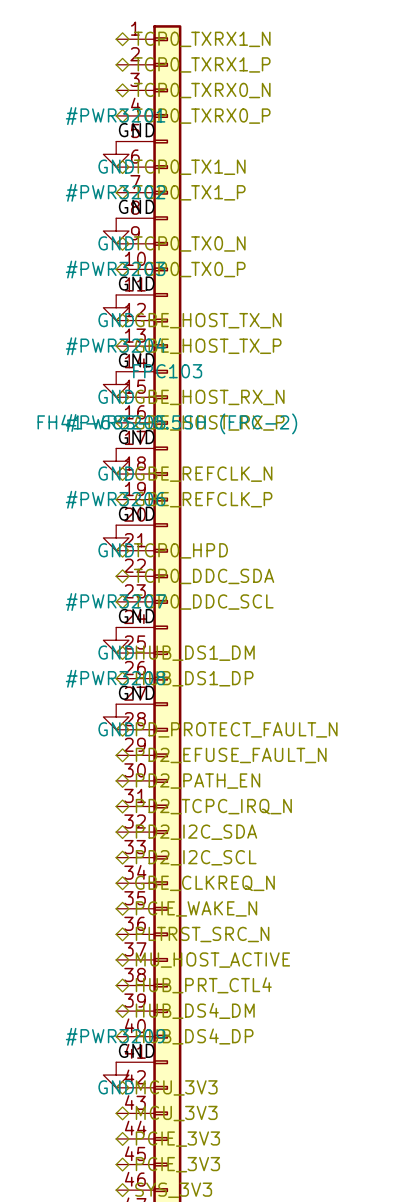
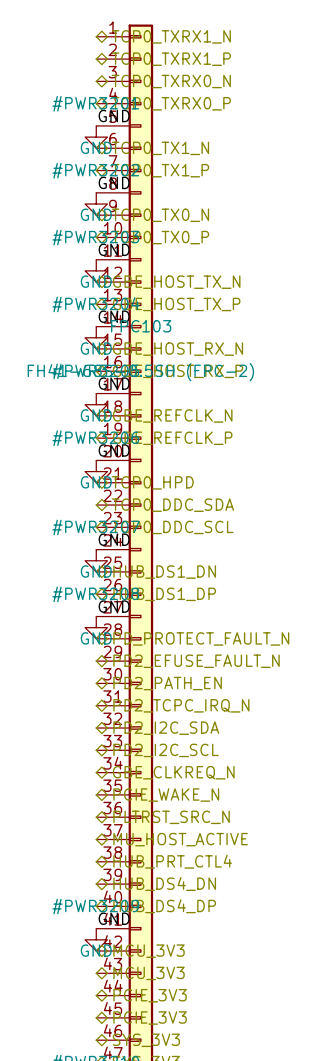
hierarchical label: HUB_DS1_DM (195, 653) -> HUB_DS1_DN (164, 572)
hierarchical label: HUB_DS4_DM (195, 1010) -> HUB_DS4_DN (164, 883)

